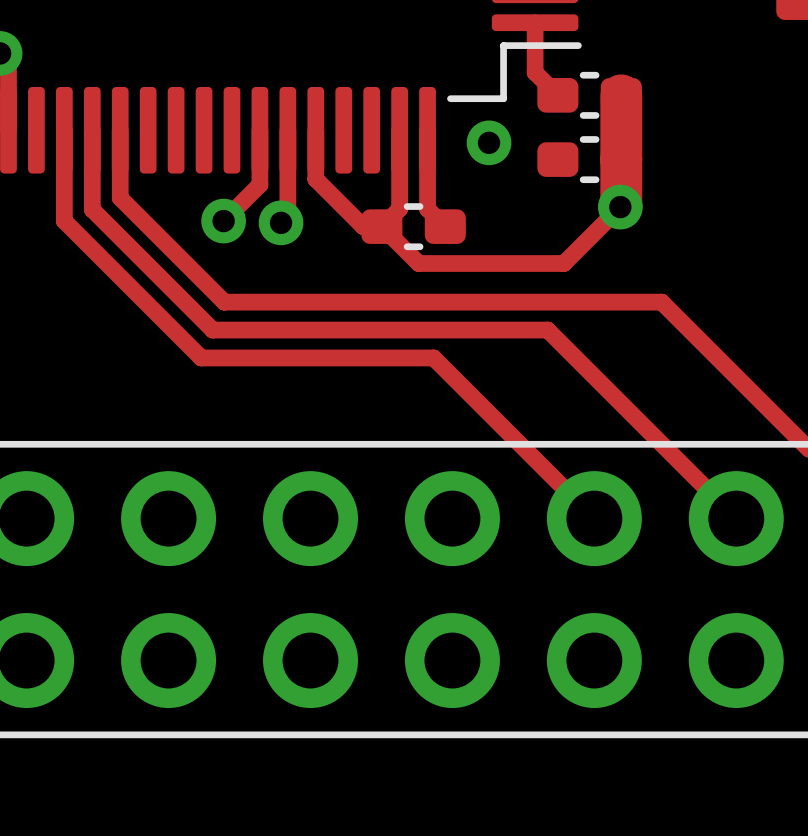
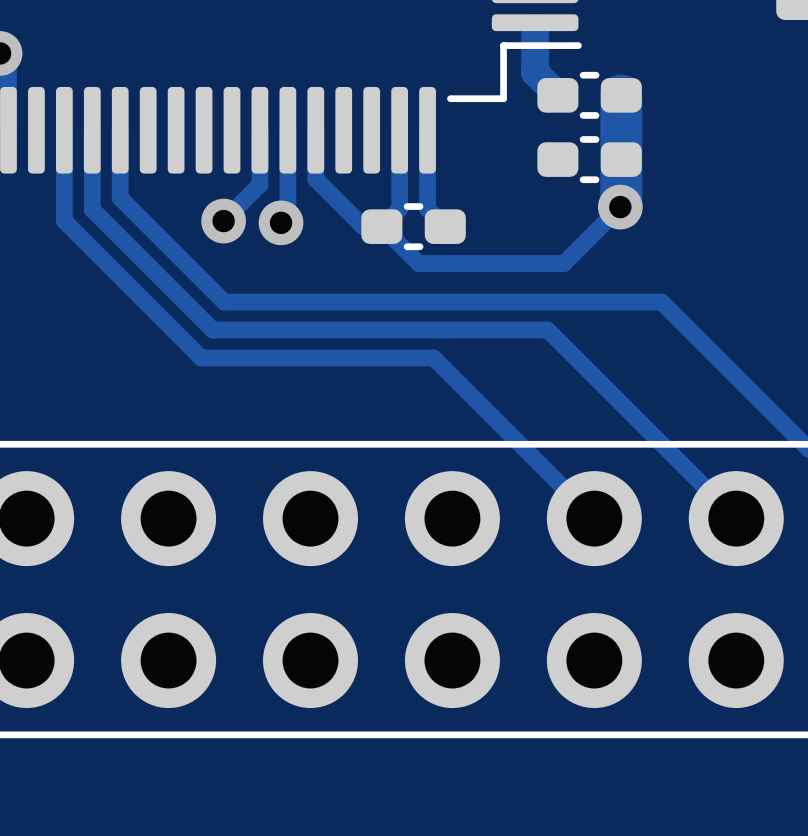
track width: thin (535, 28) (535, 72) (557, 95) -> thick (535, 28) (535, 72) (557, 95)
via: (489, 142) -> none

